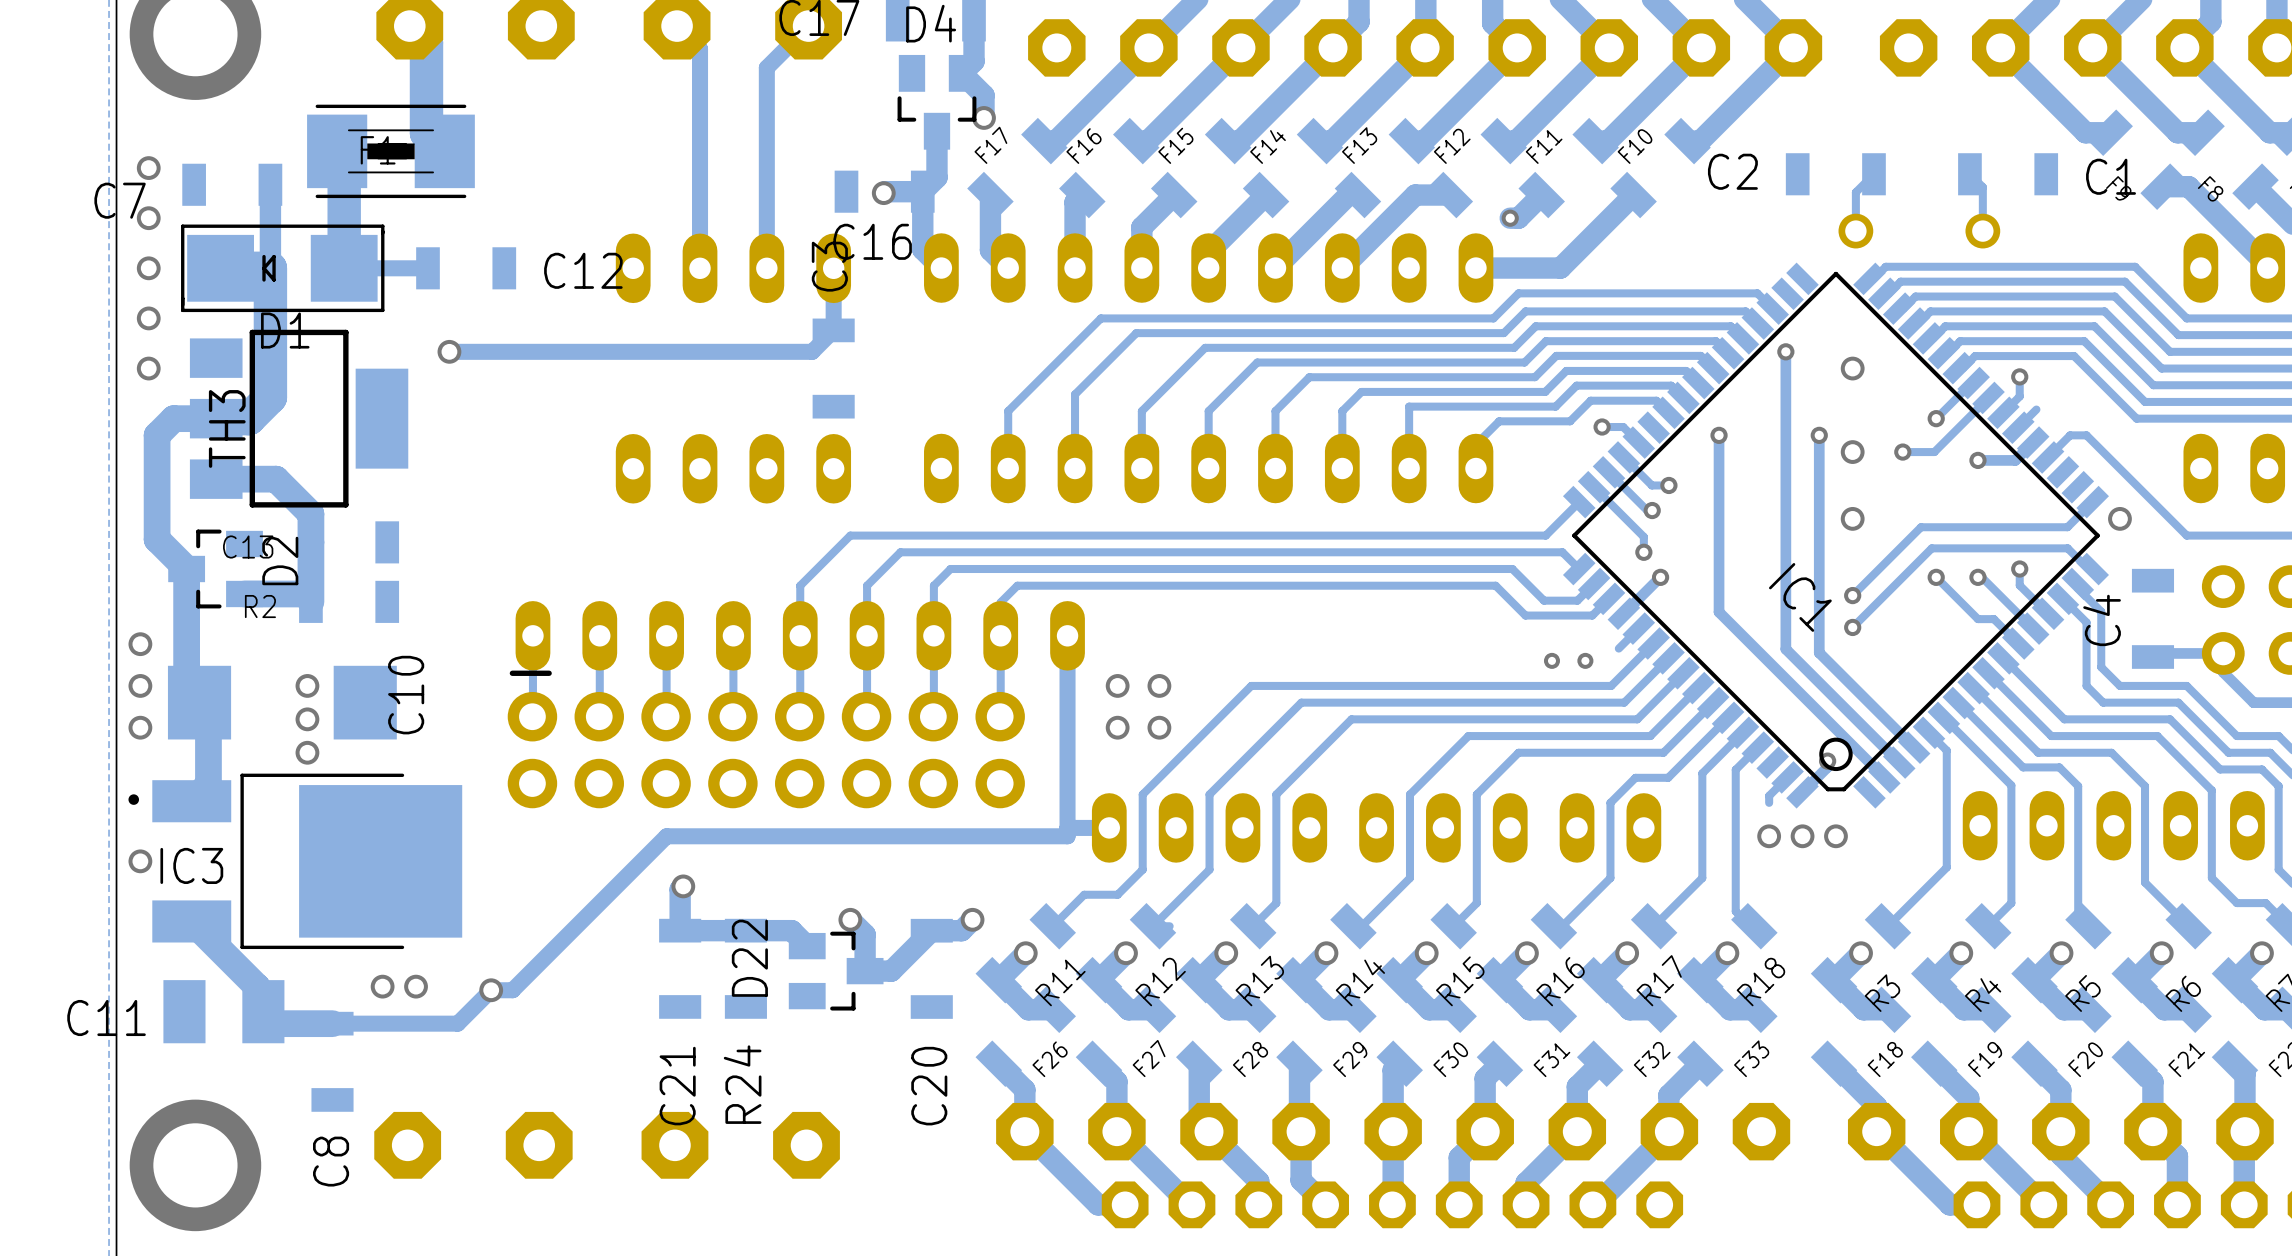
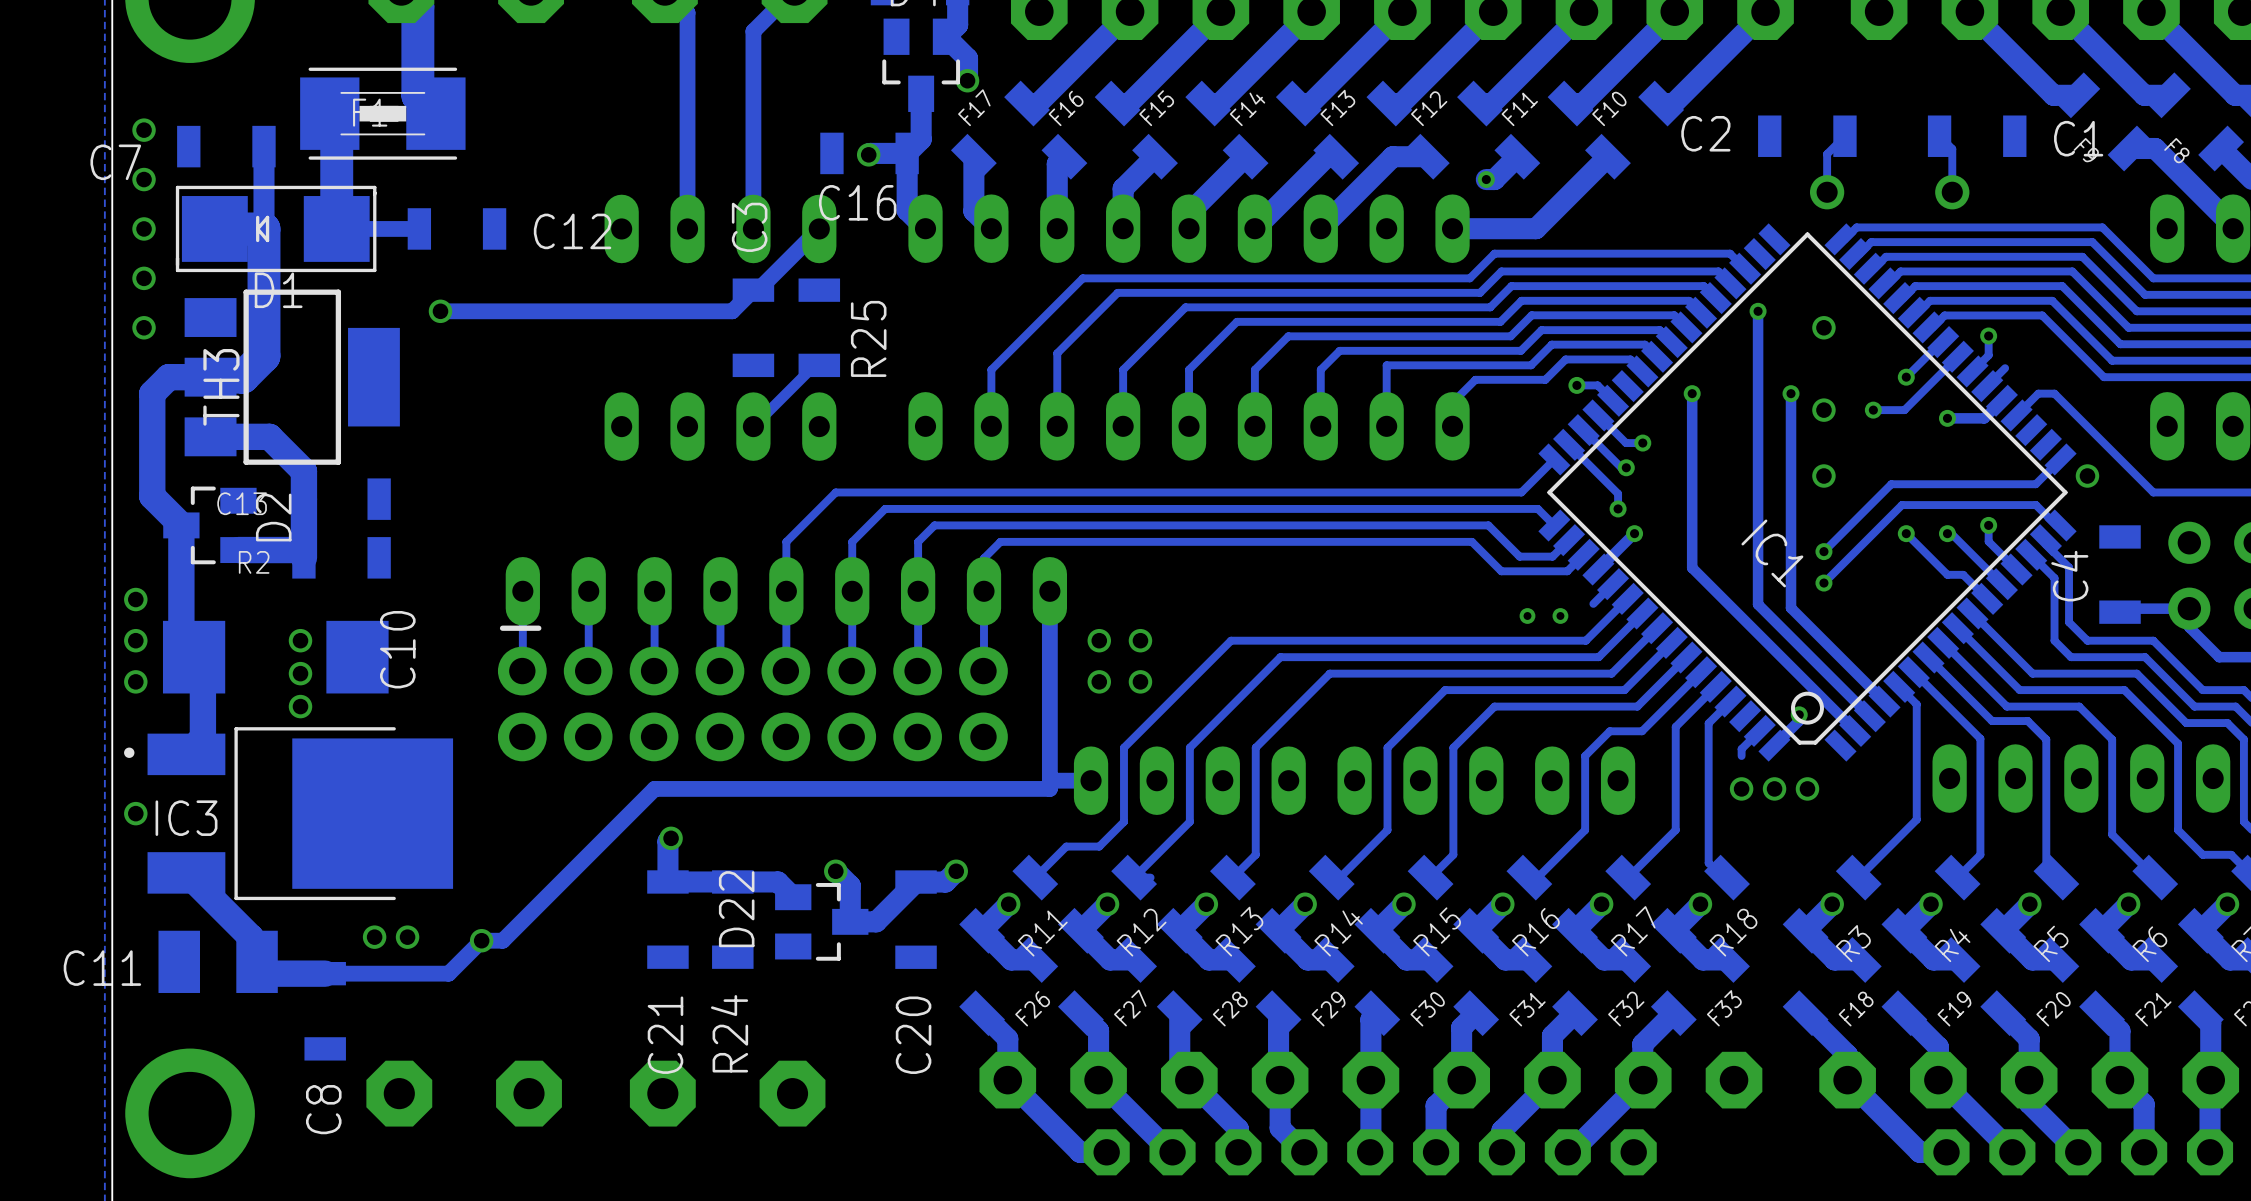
C3 name: C3 (829, 266) -> R25 (868, 338)
track: (833, 268) (833, 330) (812, 351) (745, 351) -> (819, 228) (758, 290) (753, 290) (732, 311)
C3: none -> (753, 327)
track: none -> (819, 365) (814, 365) (753, 426)

